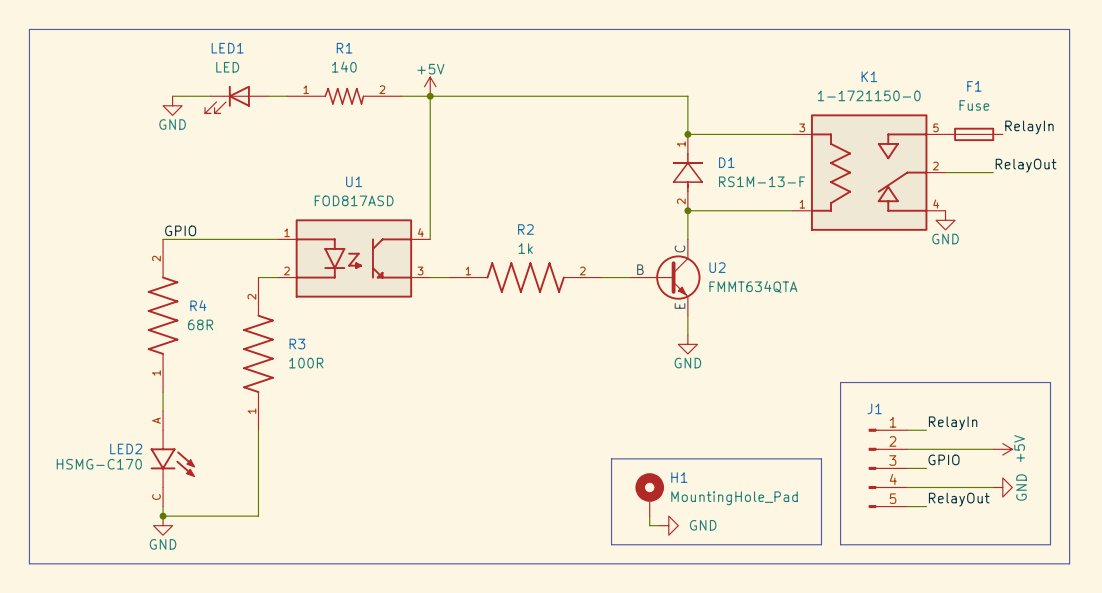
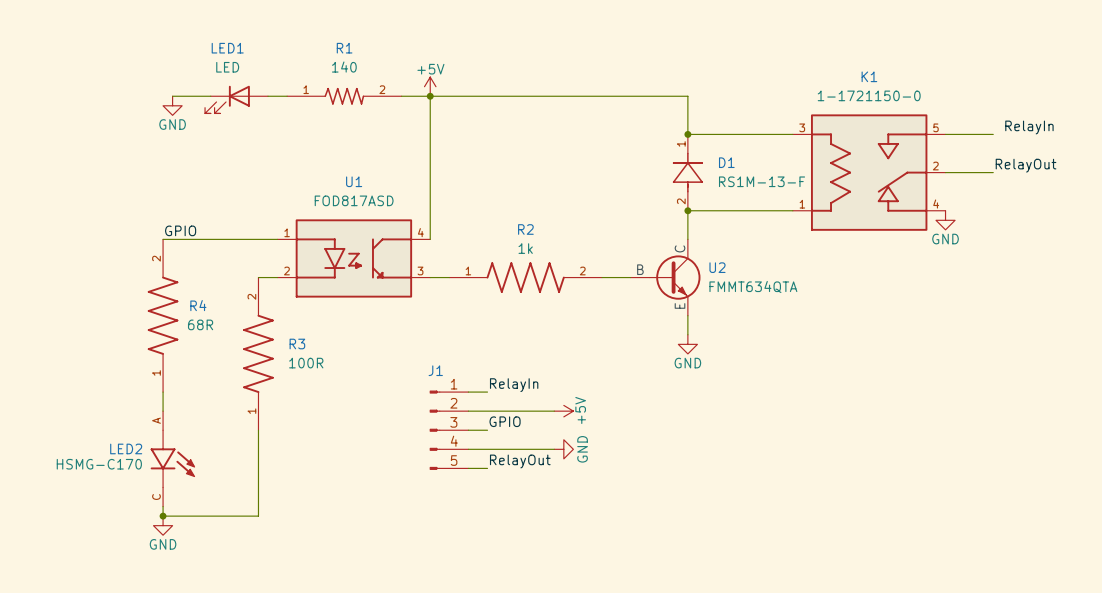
line: (29, 29) (1069, 29) (1069, 563) (29, 563) (29, 29) -> none
F1: Fuse (974, 134) -> none
line: (840, 382) (1050, 382) (1050, 544) (840, 544) (840, 382) -> none
label: none -> RelayIn (514, 385)
wire: none -> (468, 392) (487, 392)
wire: none -> (468, 411) (554, 411)
power symbol: none -> +5V (563, 411)
label: none -> GPIO (505, 421)
label: RelayIn (953, 423) -> none
wire: none -> (468, 430) (487, 430)
wire: (907, 430) (926, 430) -> none
wire: none -> (468, 449) (554, 449)
wire: (907, 449) (993, 449) -> none
power symbol: +5V (1002, 449) -> none
line: (611, 458) (821, 458) (821, 544) (611, 544) (611, 458) -> none
label: GPIO (944, 459) -> none
label: none -> RelayOut (520, 461)
wire: none -> (468, 468) (487, 468)
J1 position: (887, 468) -> (449, 430)
wire: (907, 468) (926, 468) -> none
wire: (907, 487) (993, 487) -> none
power symbol: GND (1002, 487) -> none
H1: MountingHole_Pad (649, 494) -> none
label: RelayOut (959, 499) -> none
wire: (907, 506) (926, 506) -> none
wire: (649, 516) (649, 525) (659, 525) -> none
power symbol position: GND (668, 525) -> GND (563, 449)
power symbol text rotation: 0° (703, 525) -> 90° counterclockwise (582, 449)

